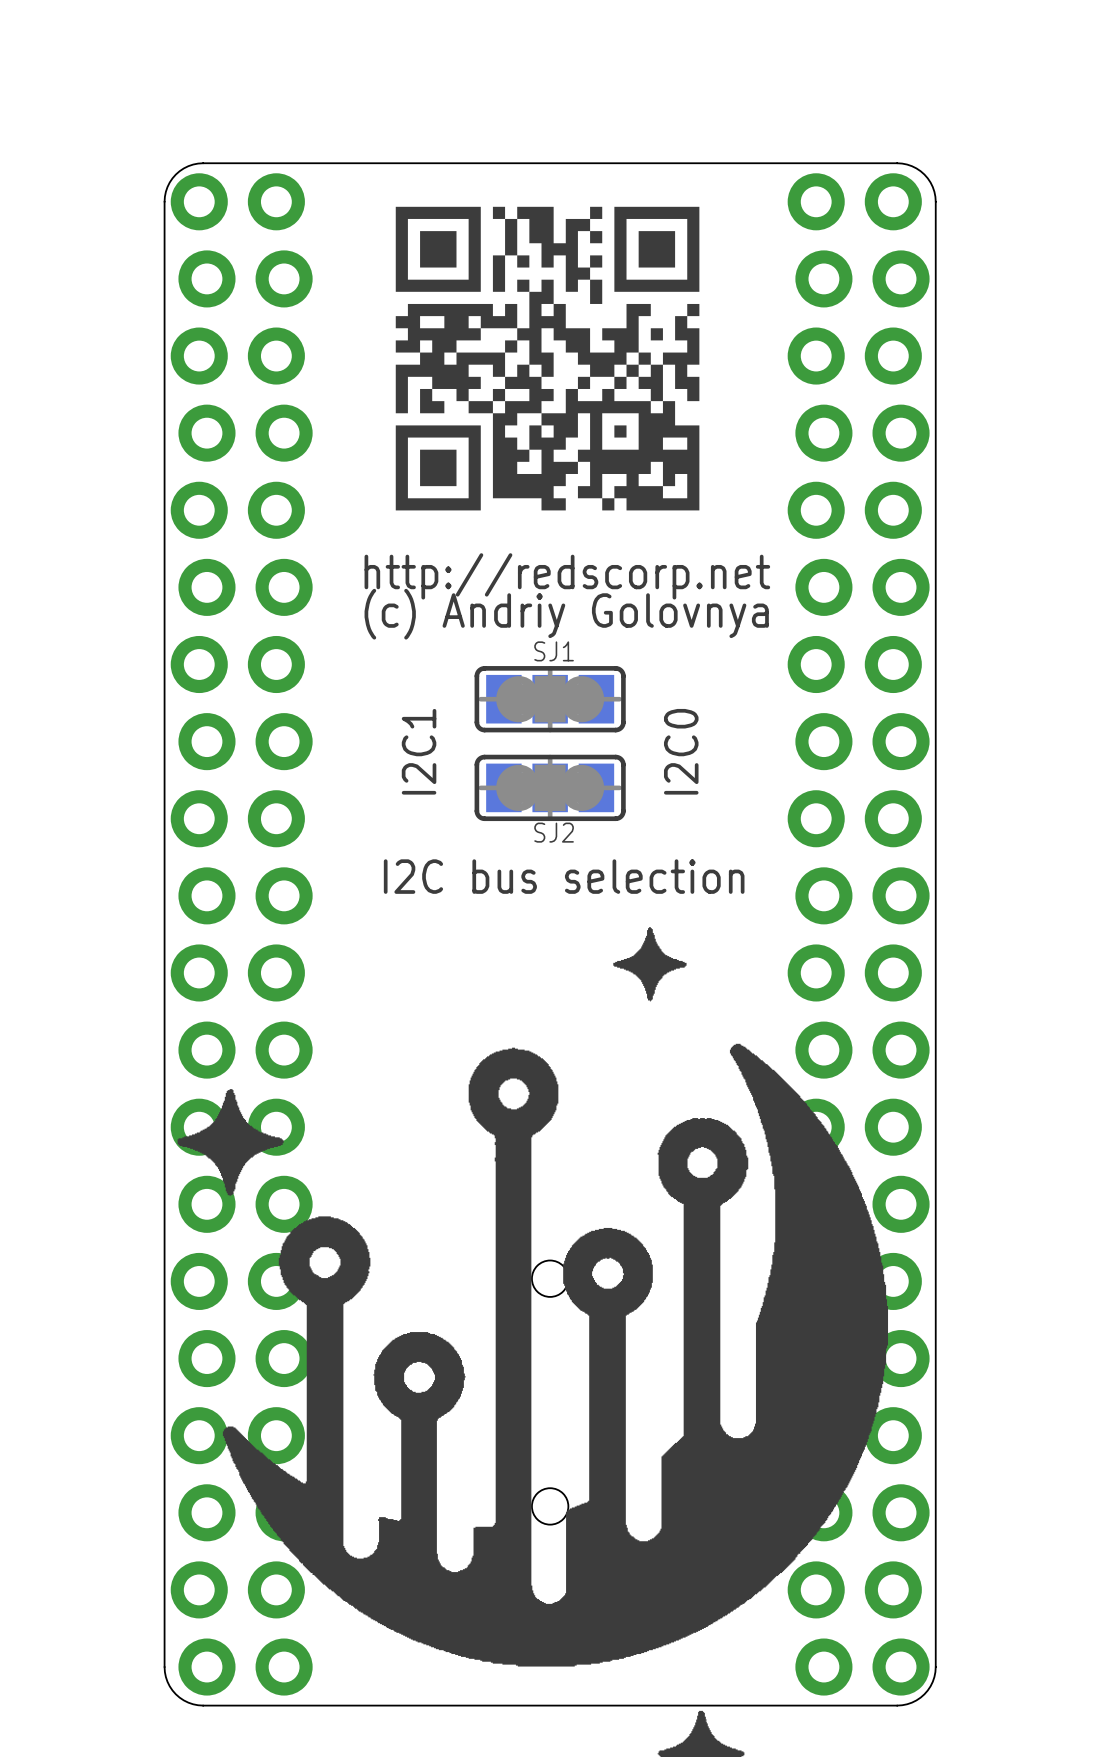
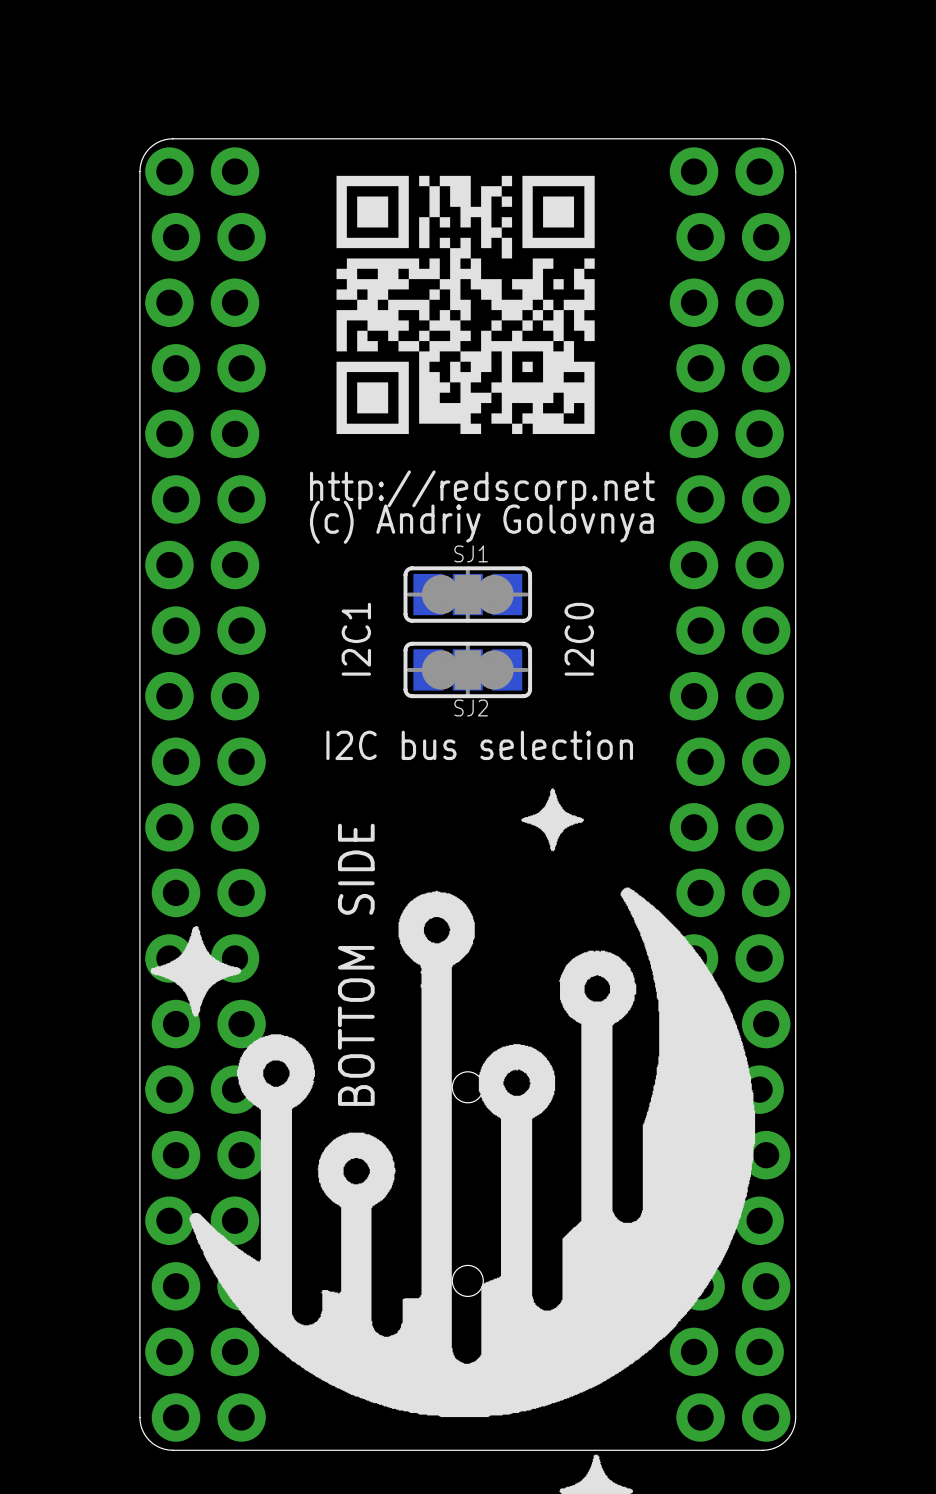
text: none -> BOTTOM SIDE (356, 964)

